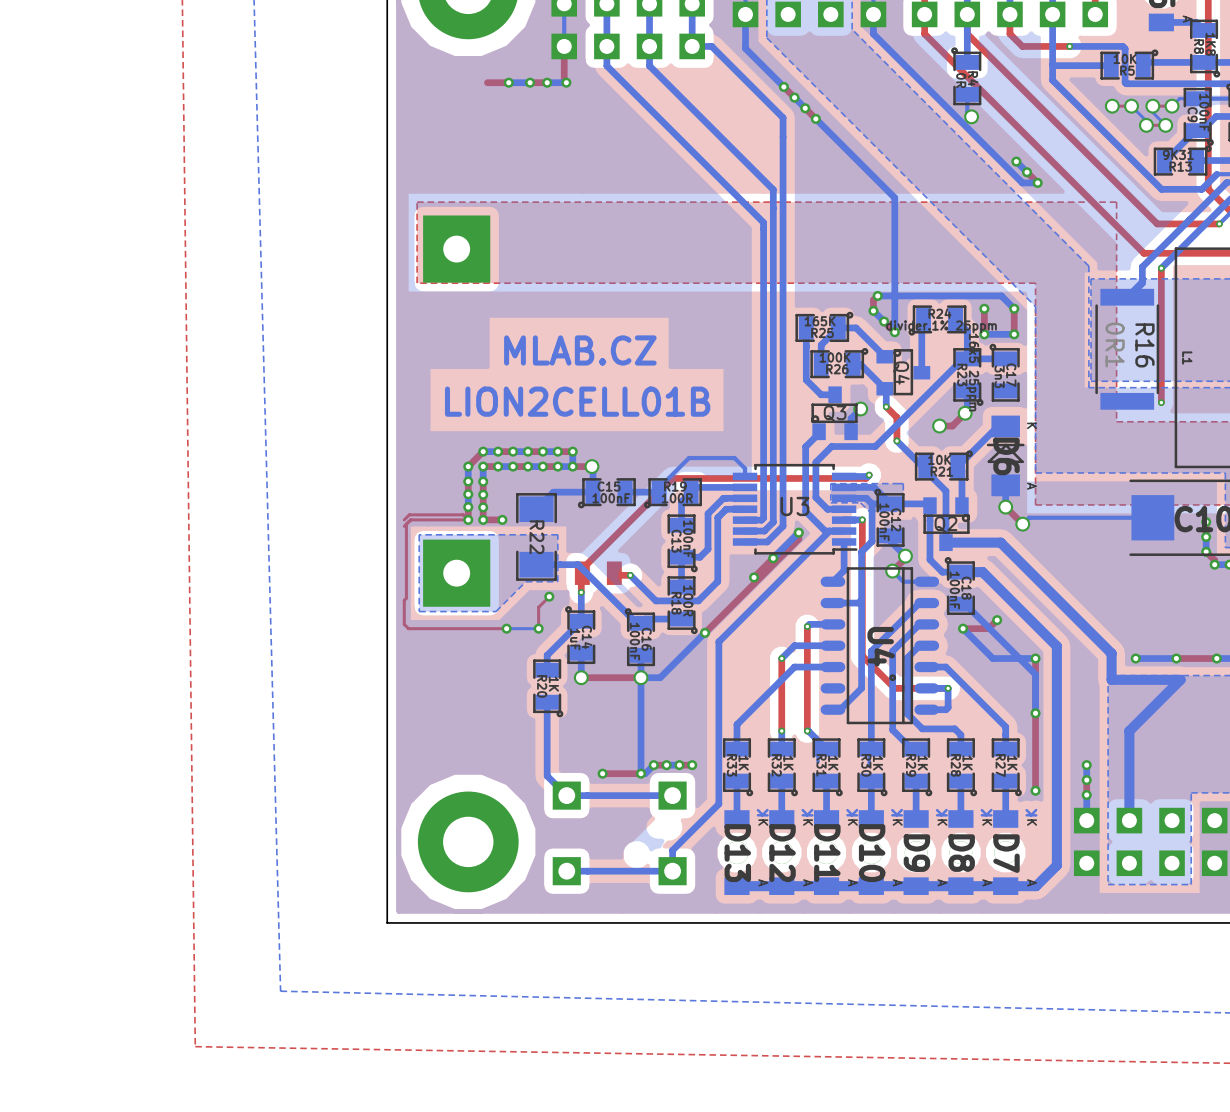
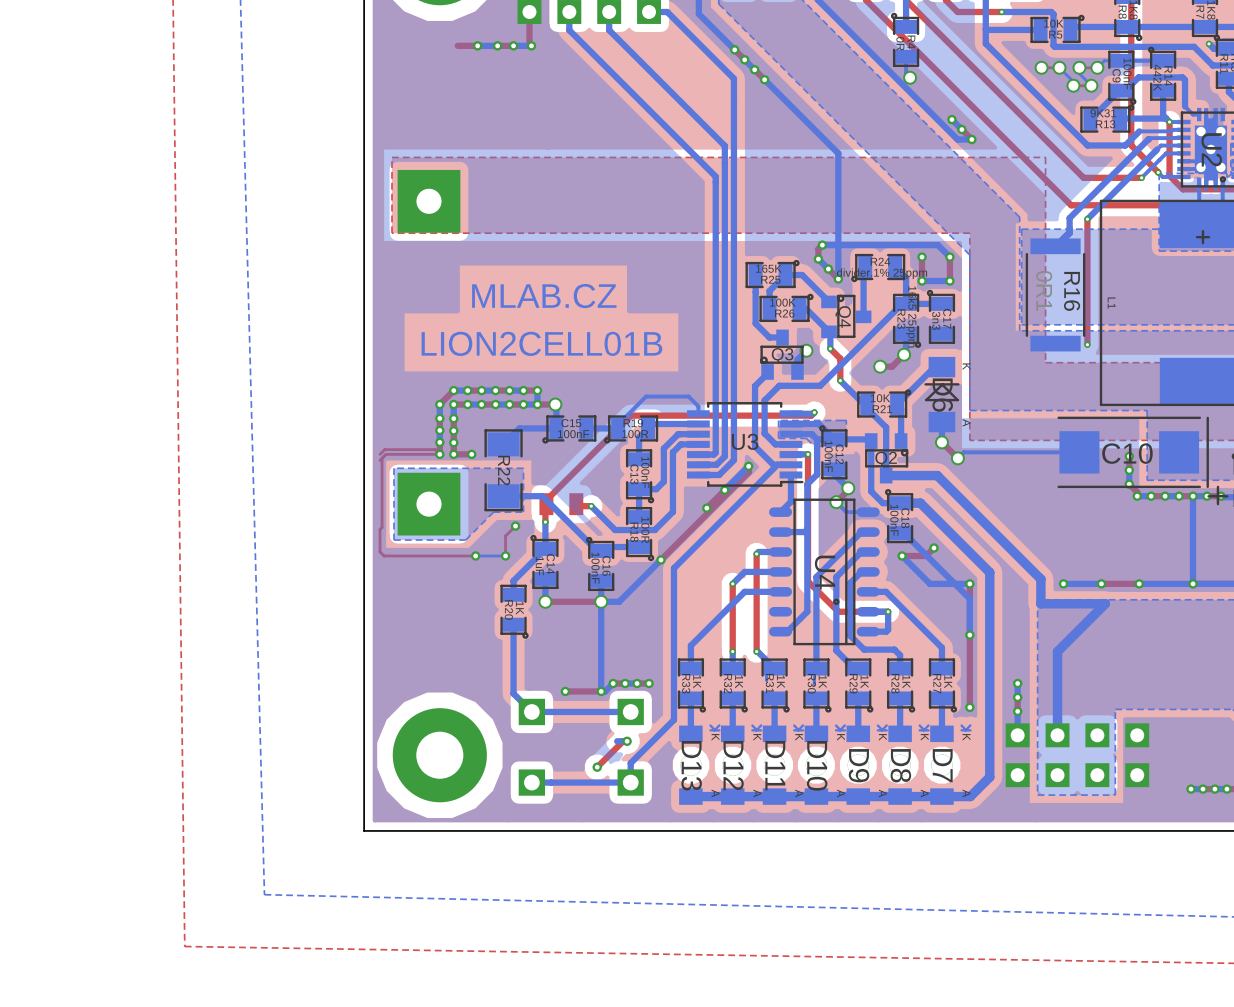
top track: none -> (627, 741) (623, 741) (597, 767)
bottom track: none -> (627, 741) (617, 741)
via: none -> (627, 741)
via: none -> (597, 767)

